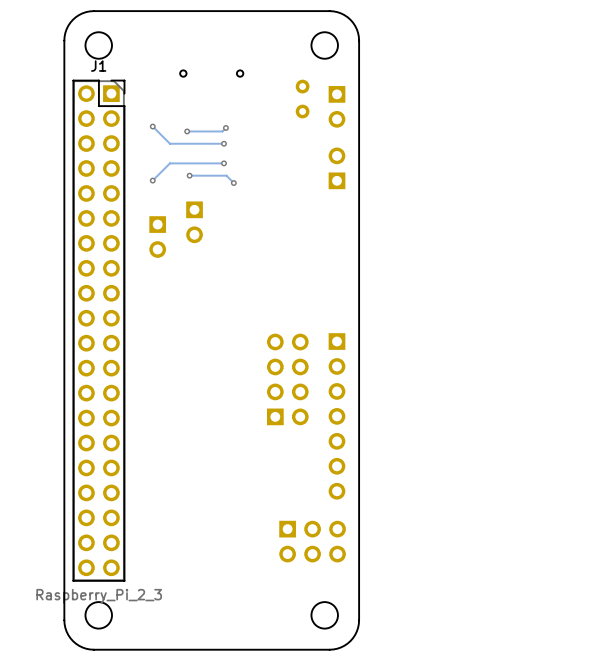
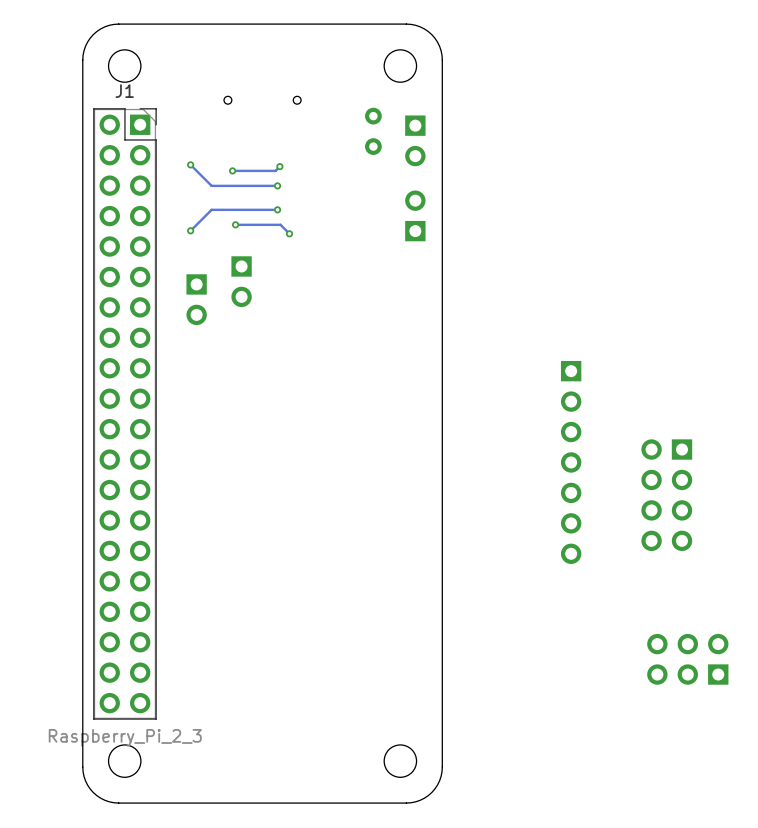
part: (287, 379) -> none
part: none -> (666, 495)
part position: (336, 416) -> (571, 462)
part: none -> (687, 659)
part: (312, 541) -> none

